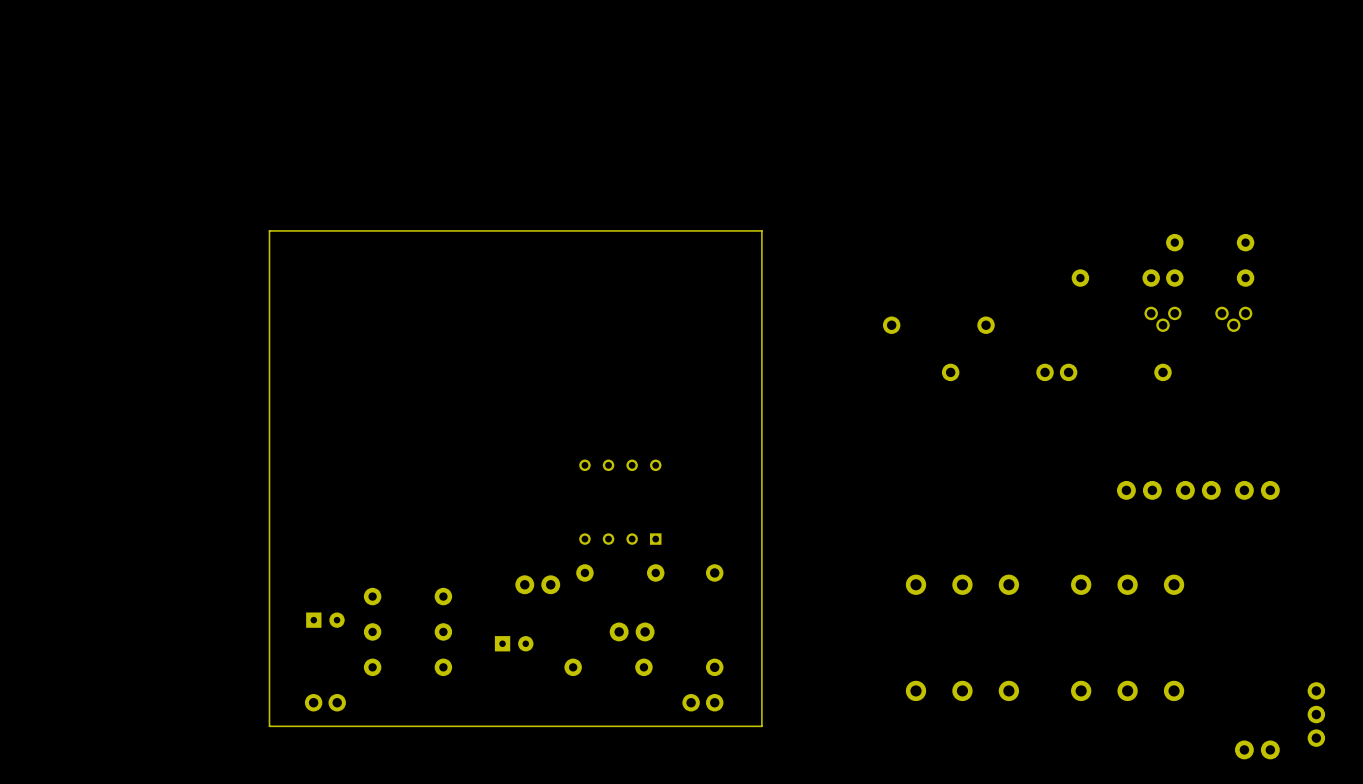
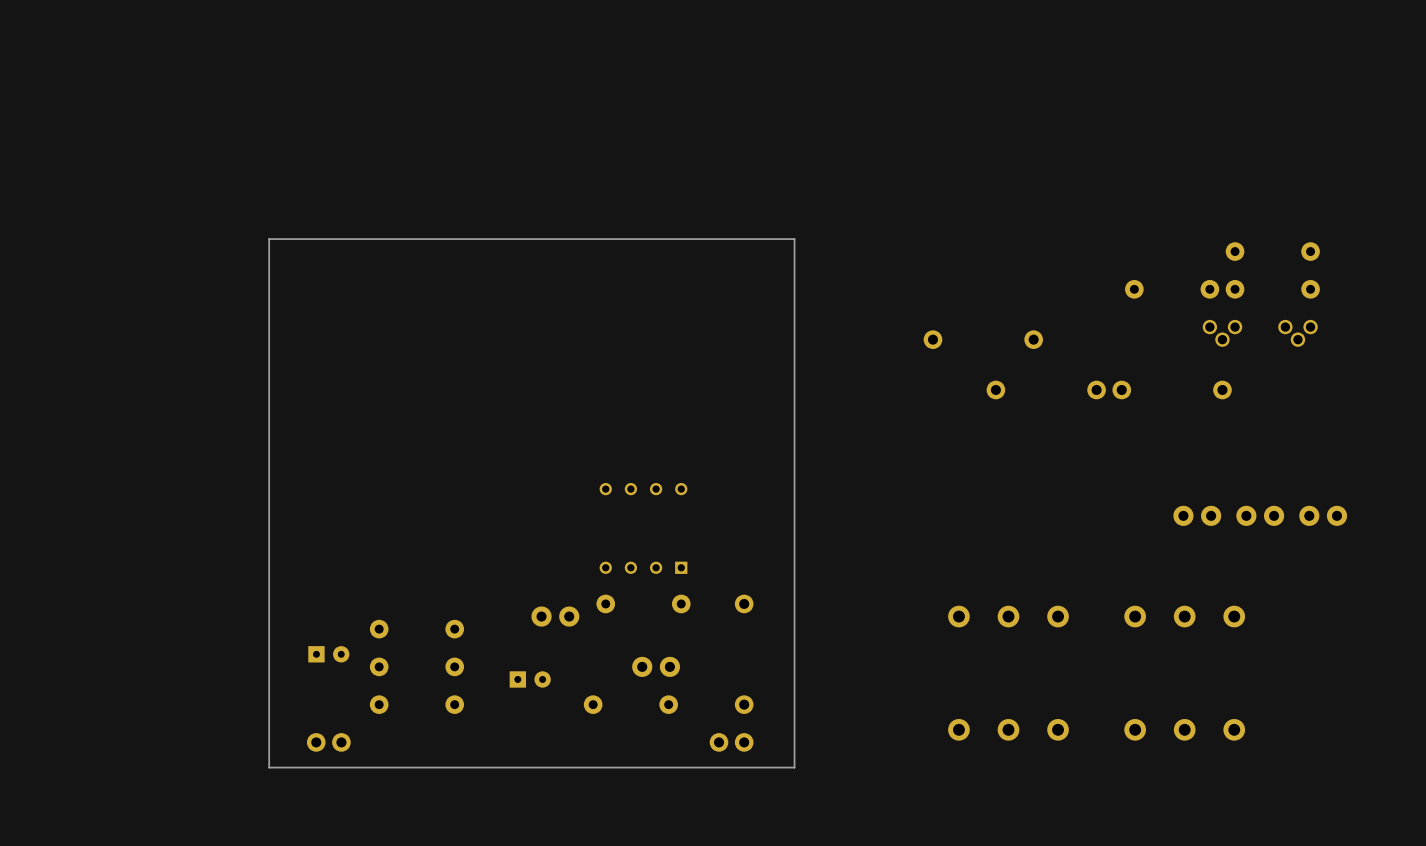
part: (1316, 714) -> none
part: (1257, 749) -> none

